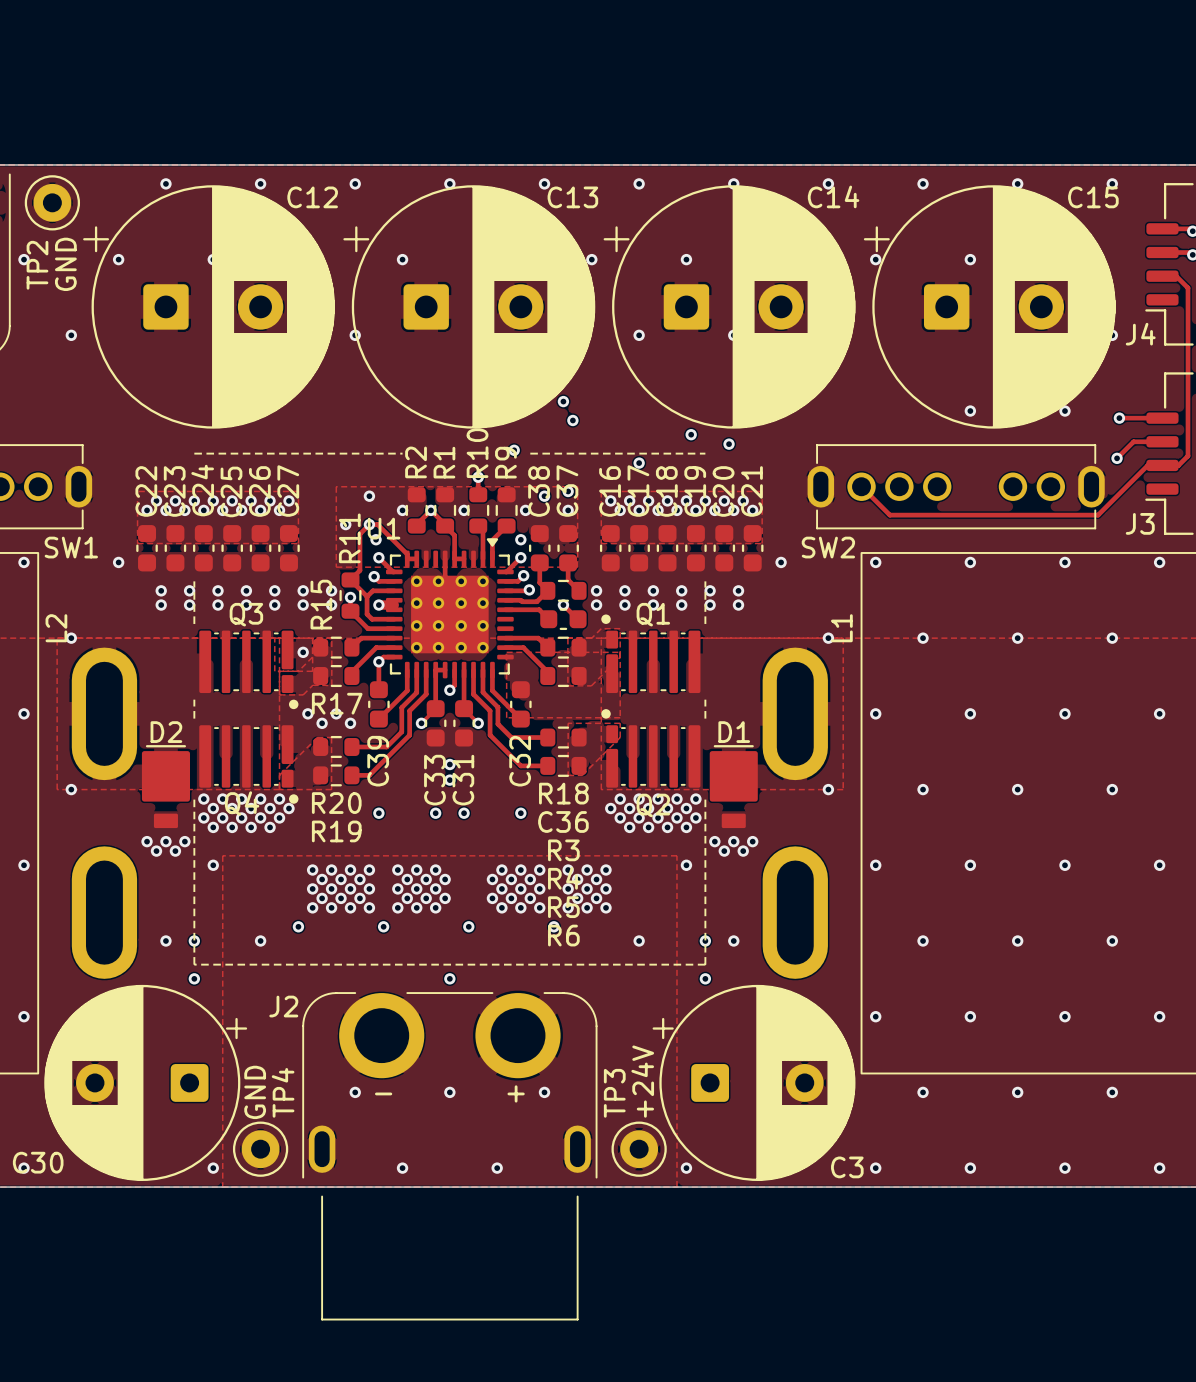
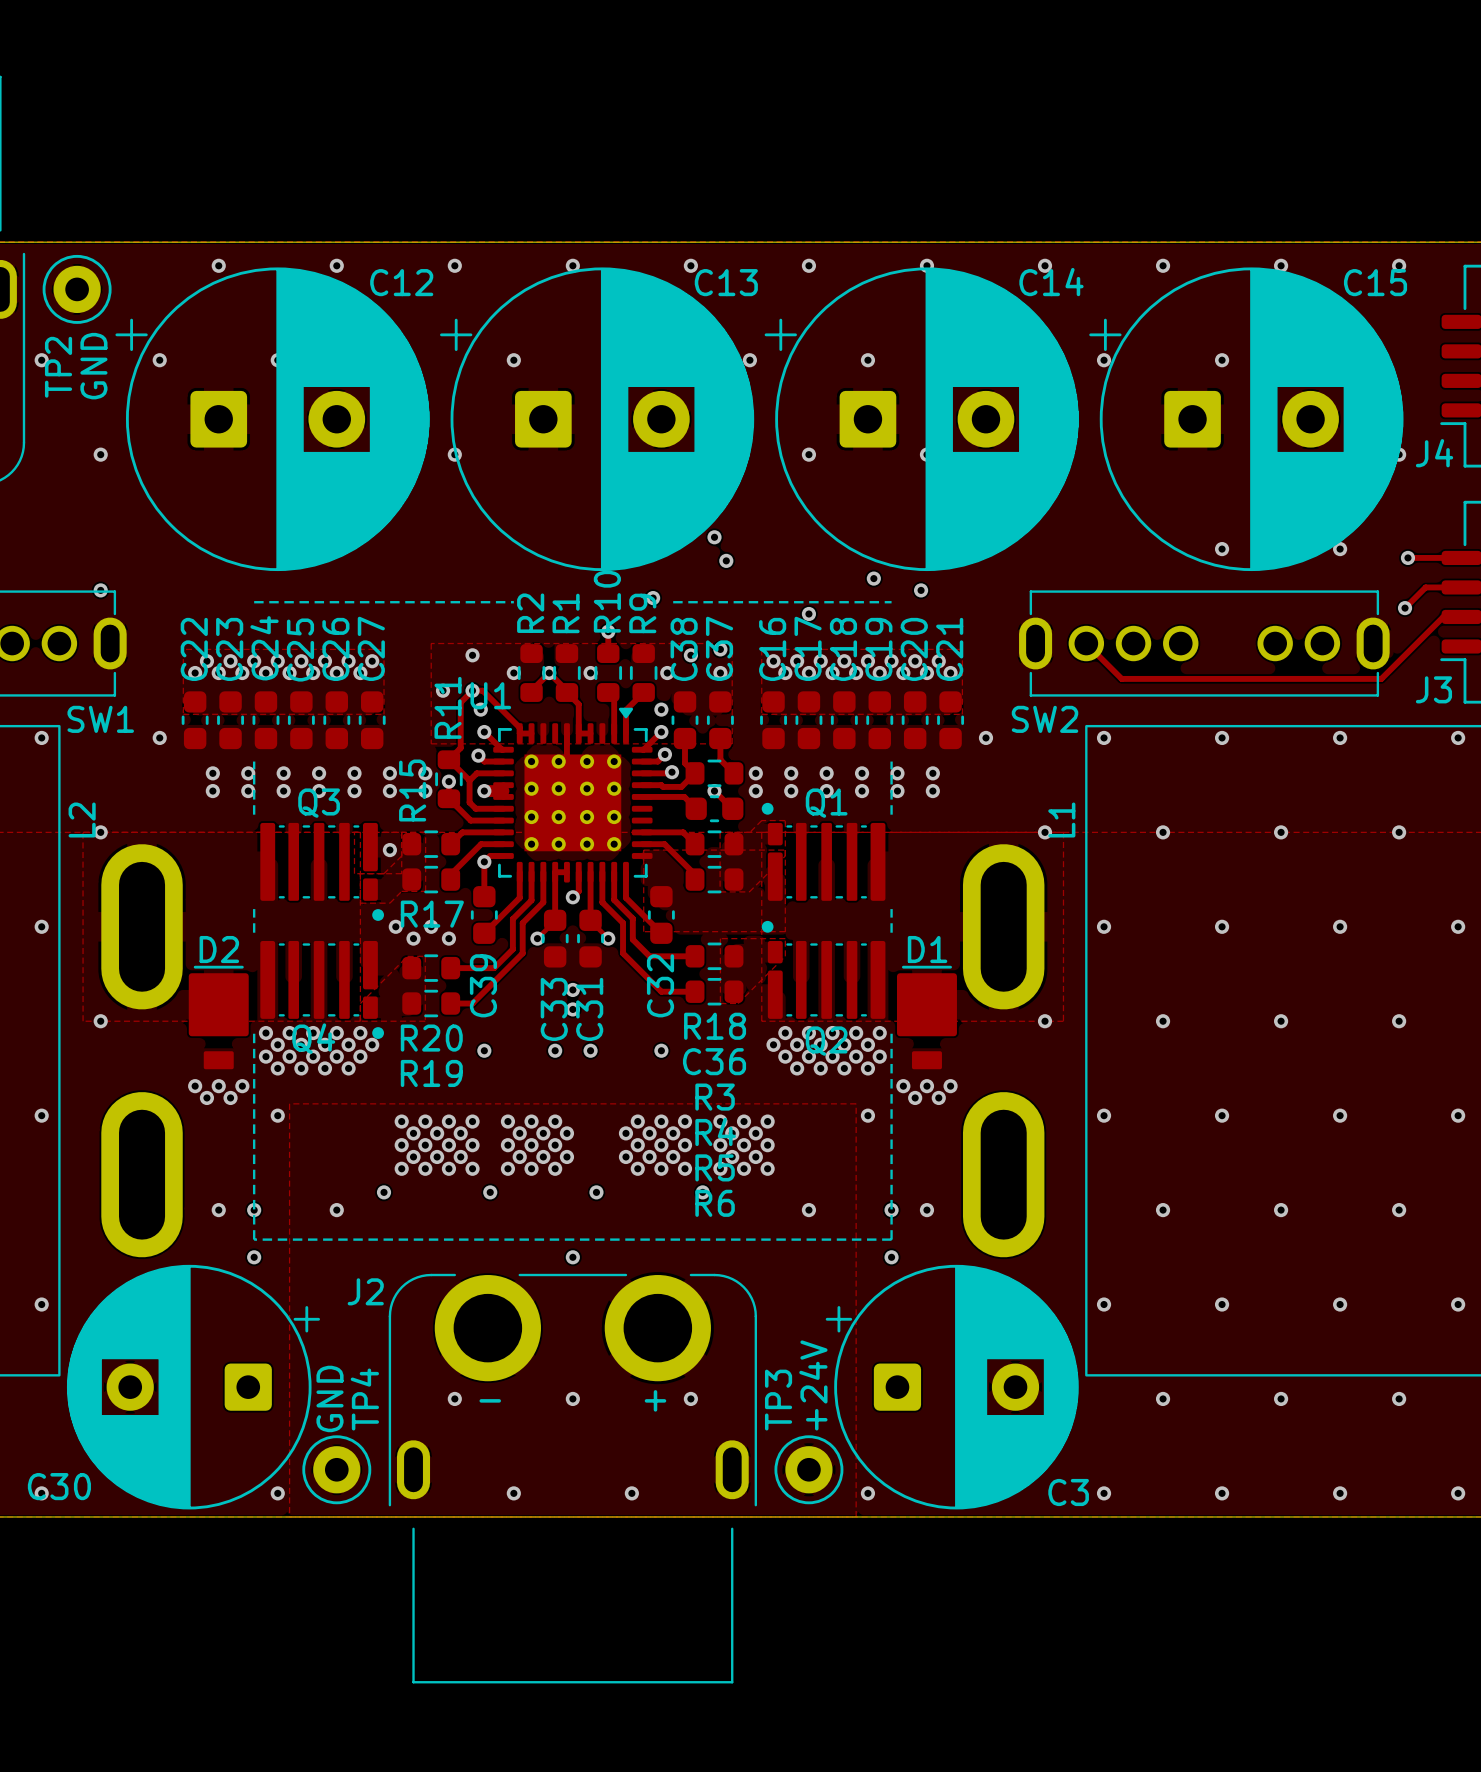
via: none -> (100, 590)

